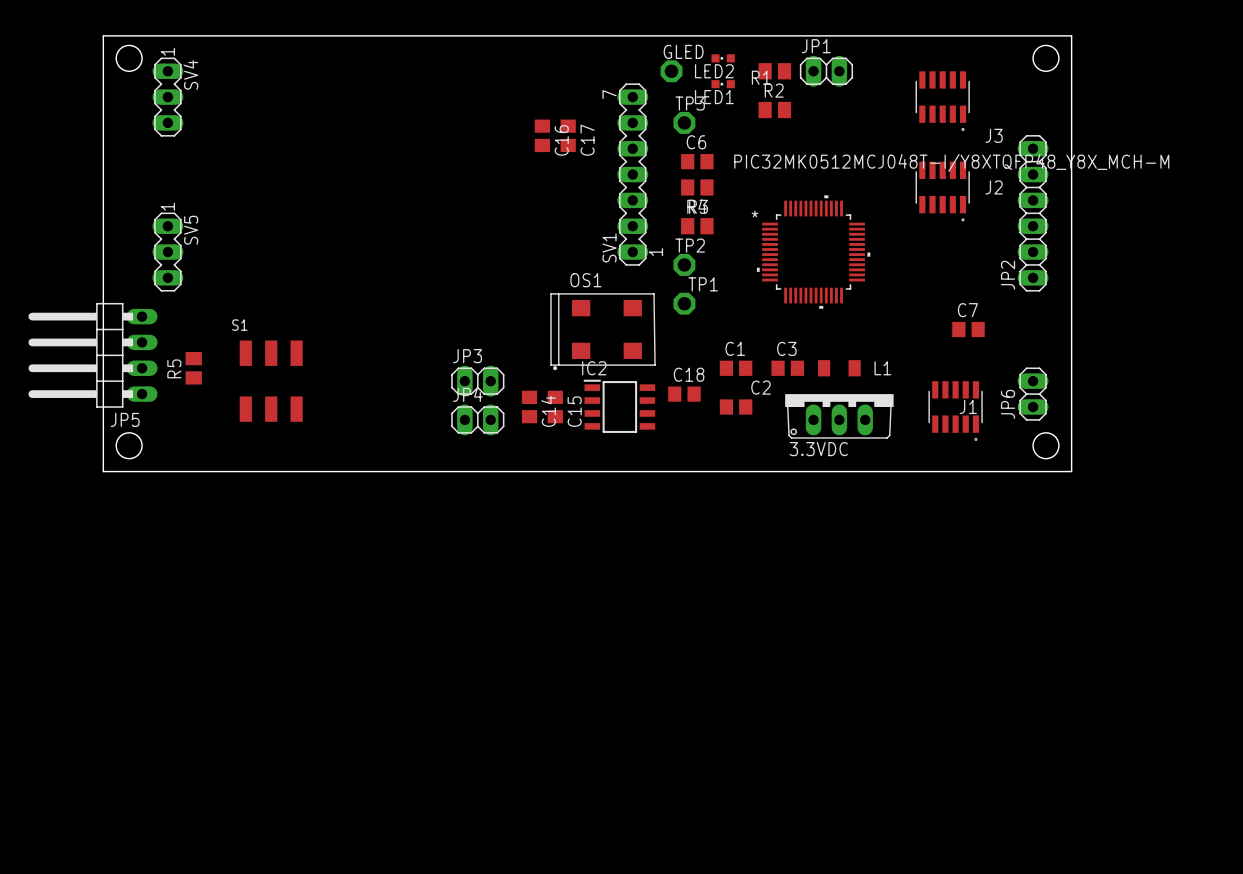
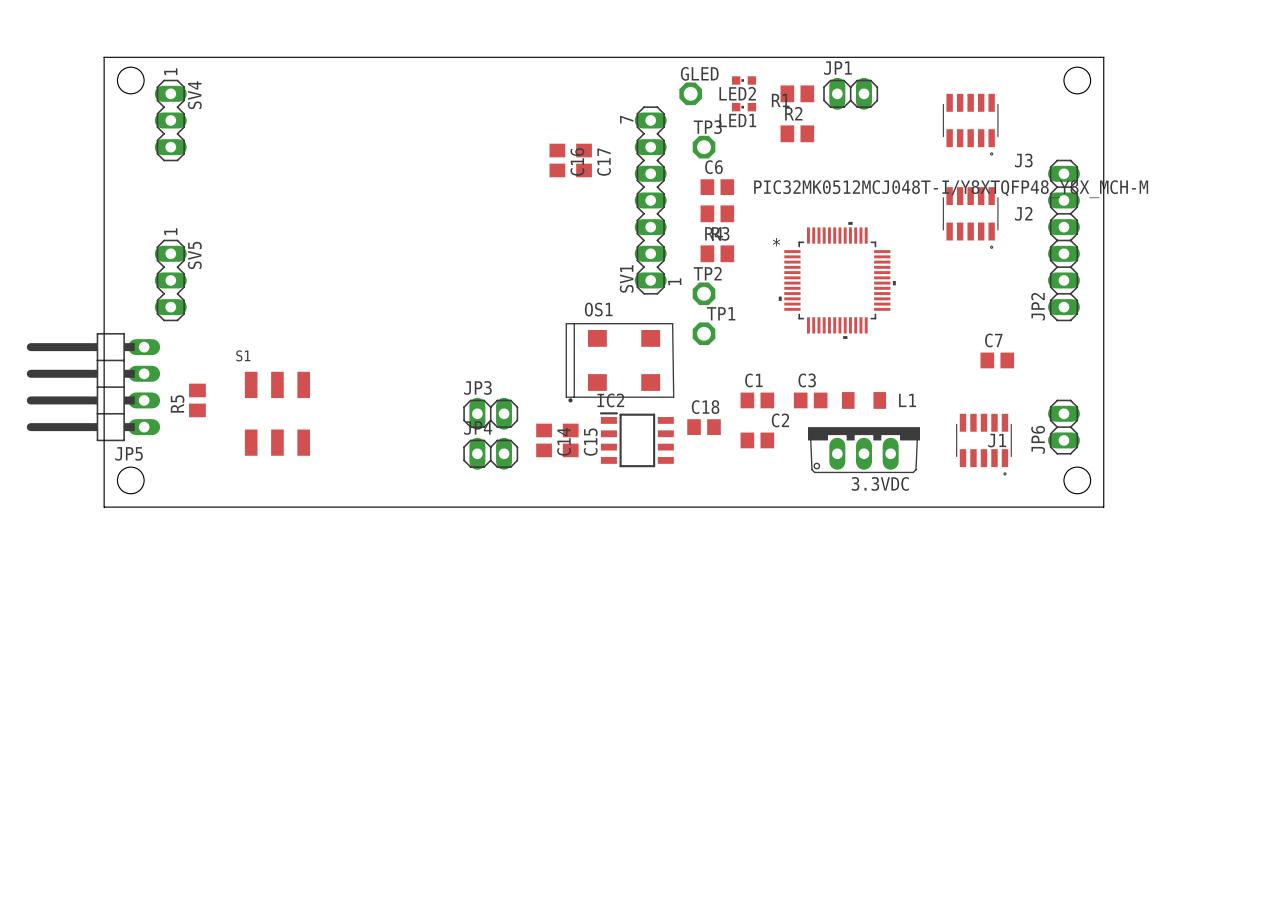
3.3VDC name position: 3.3VDC (818, 449) -> 3.3VDC (880, 483)

